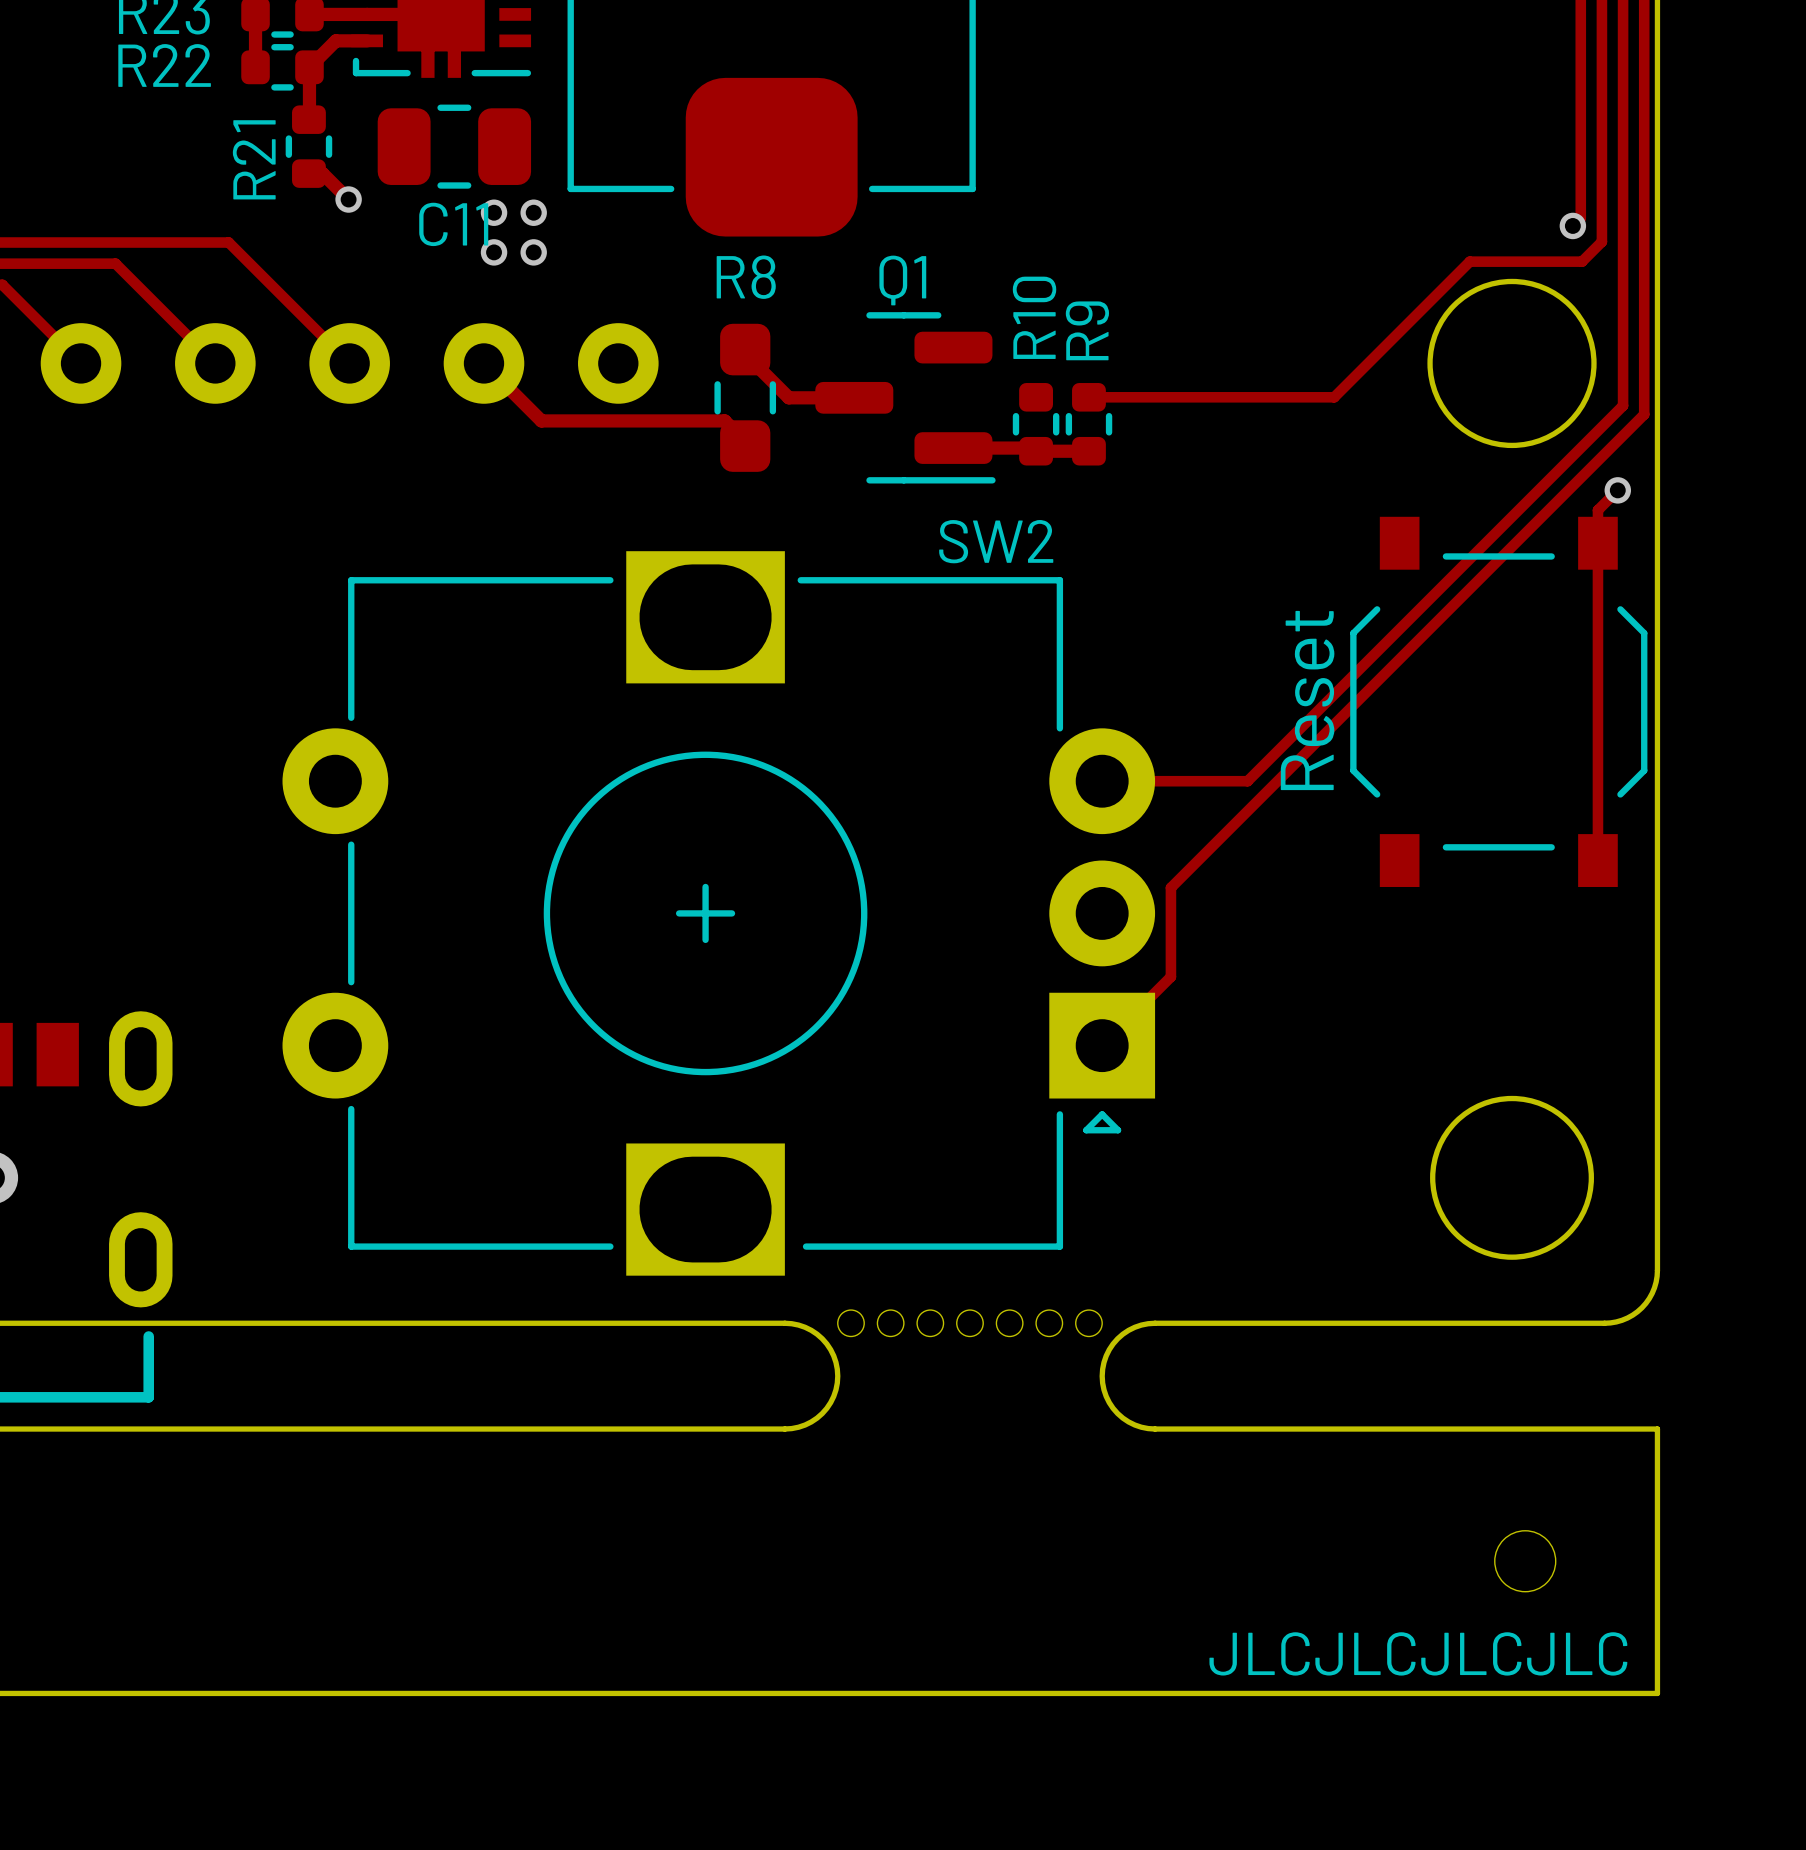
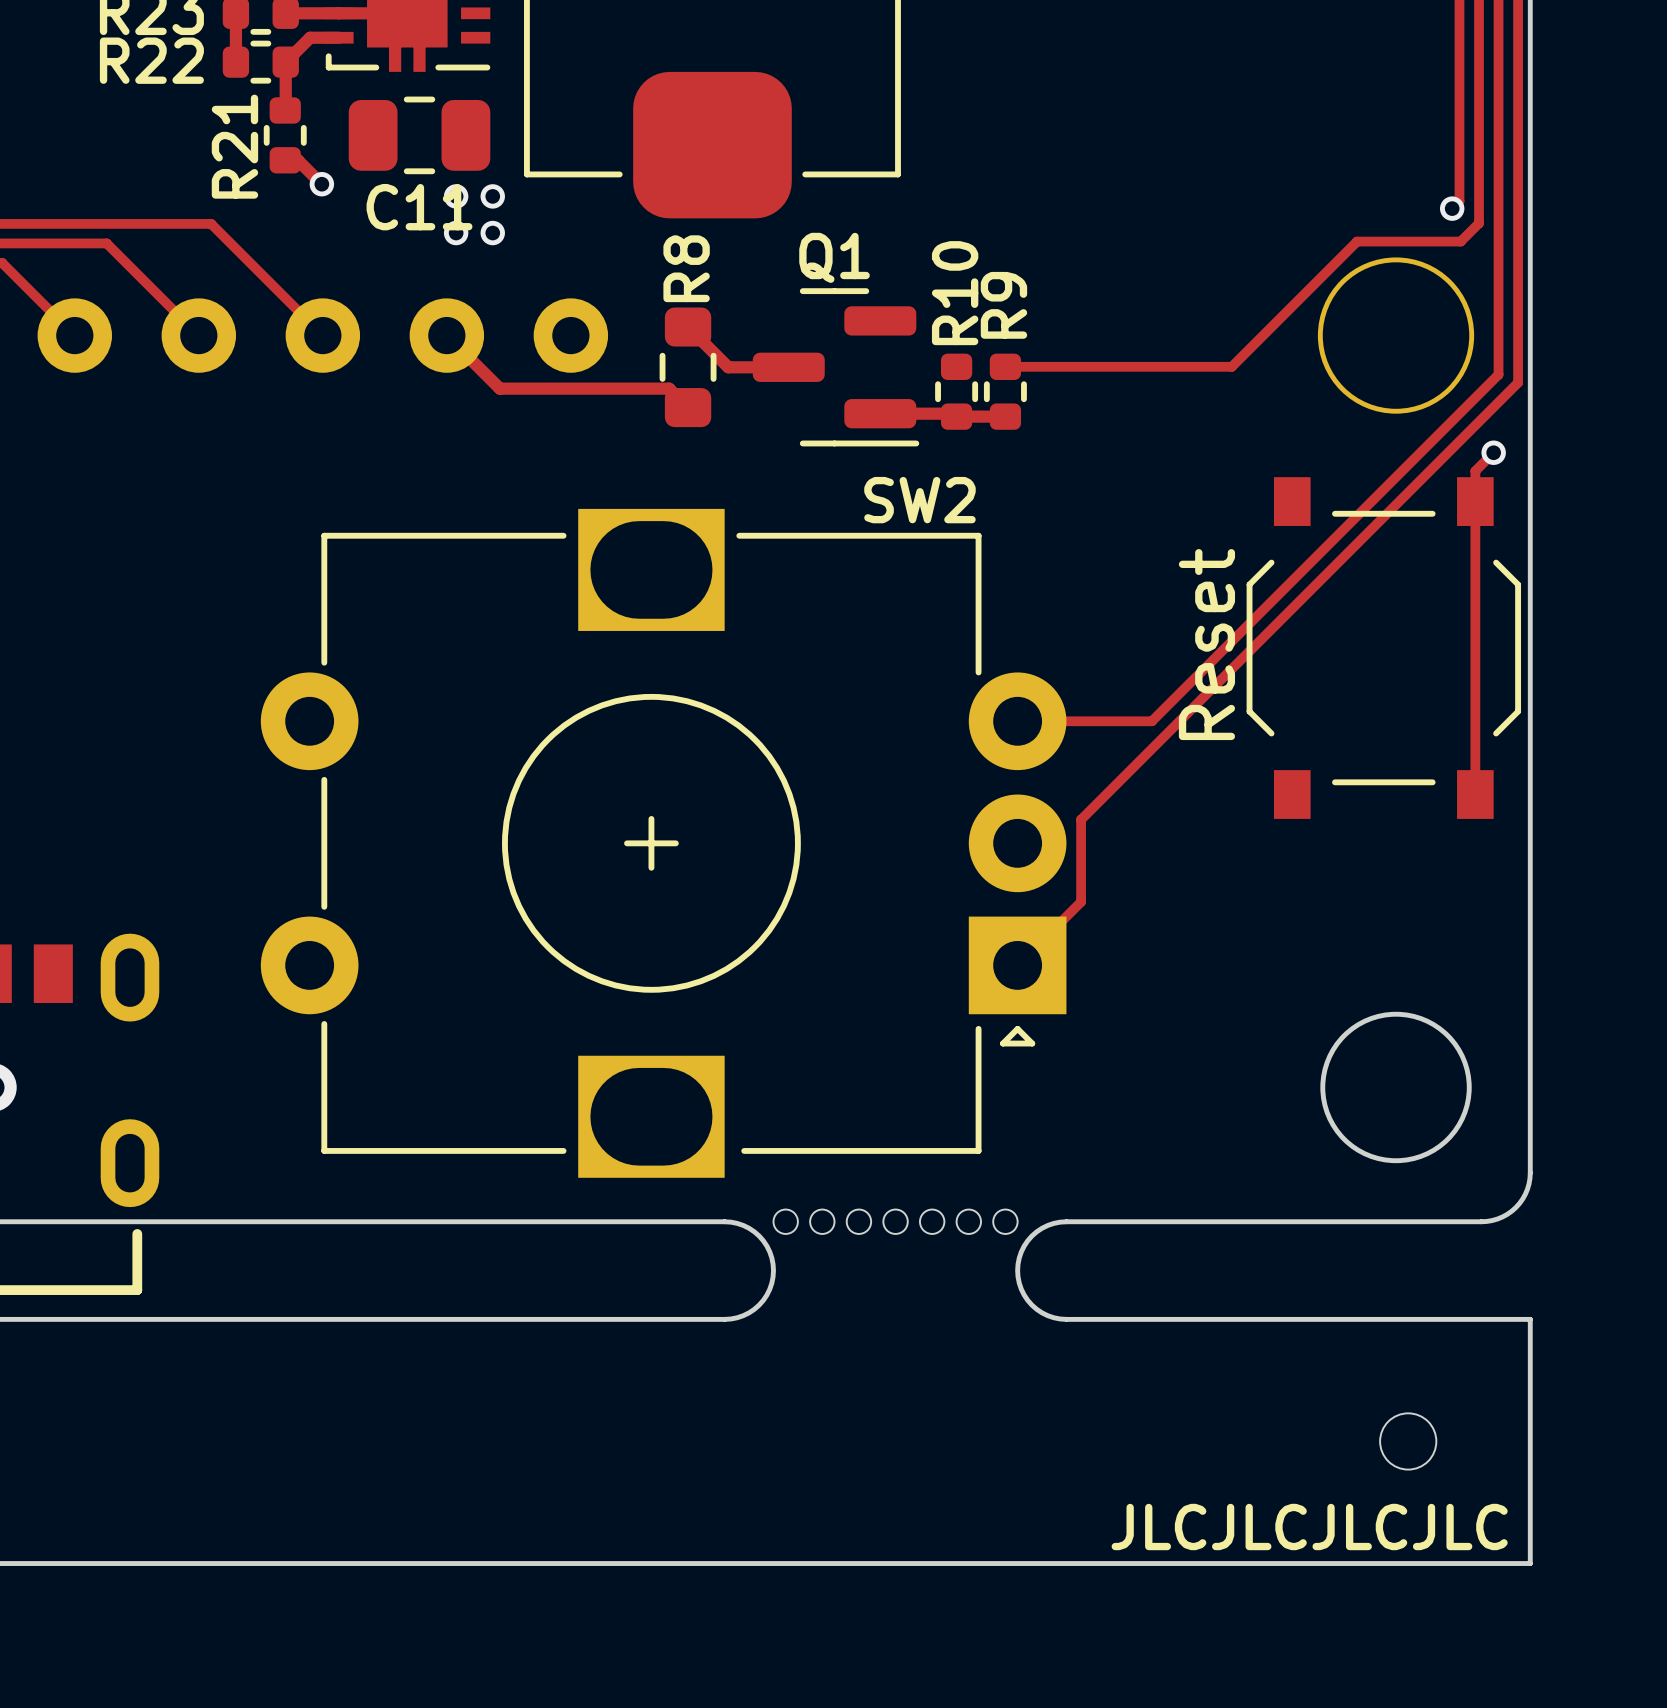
R8 name rotation: 0° (746, 277) -> 90° counterclockwise (686, 268)
R8 footprint: [714, 323, 777, 472] -> [659, 307, 717, 428]

